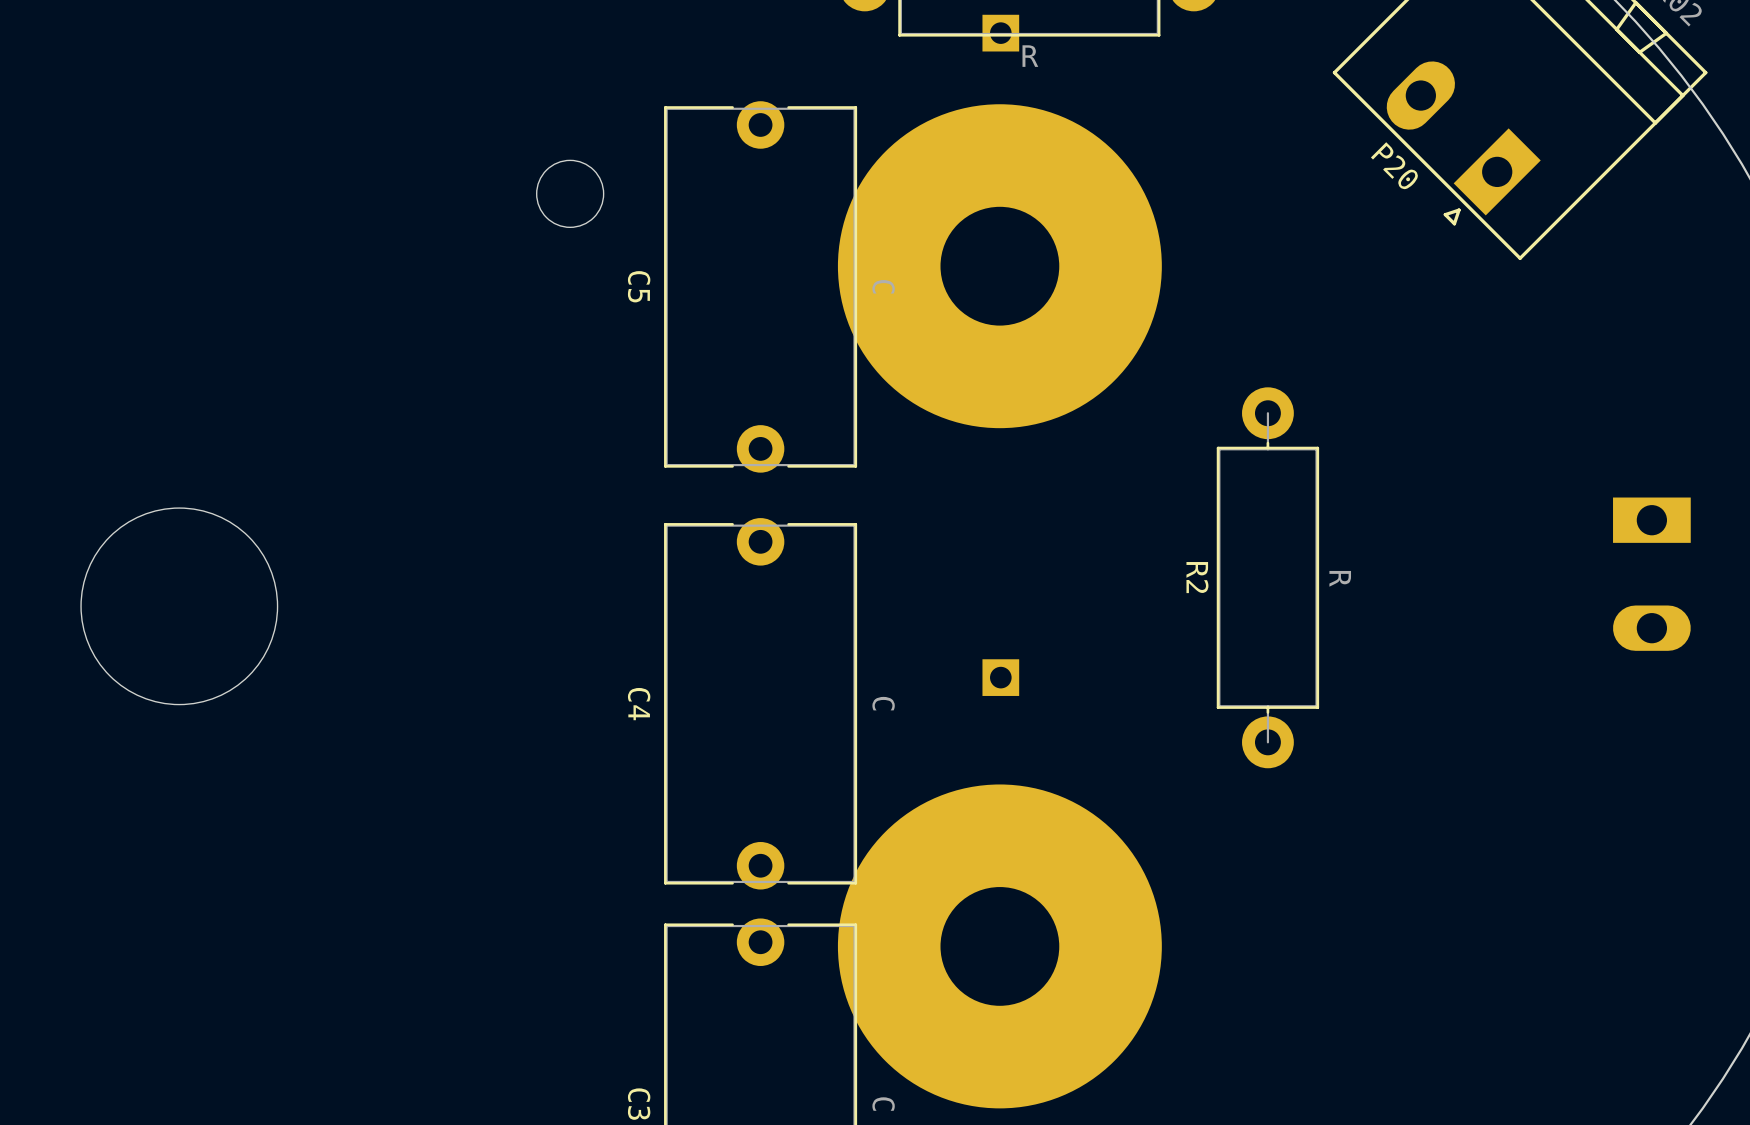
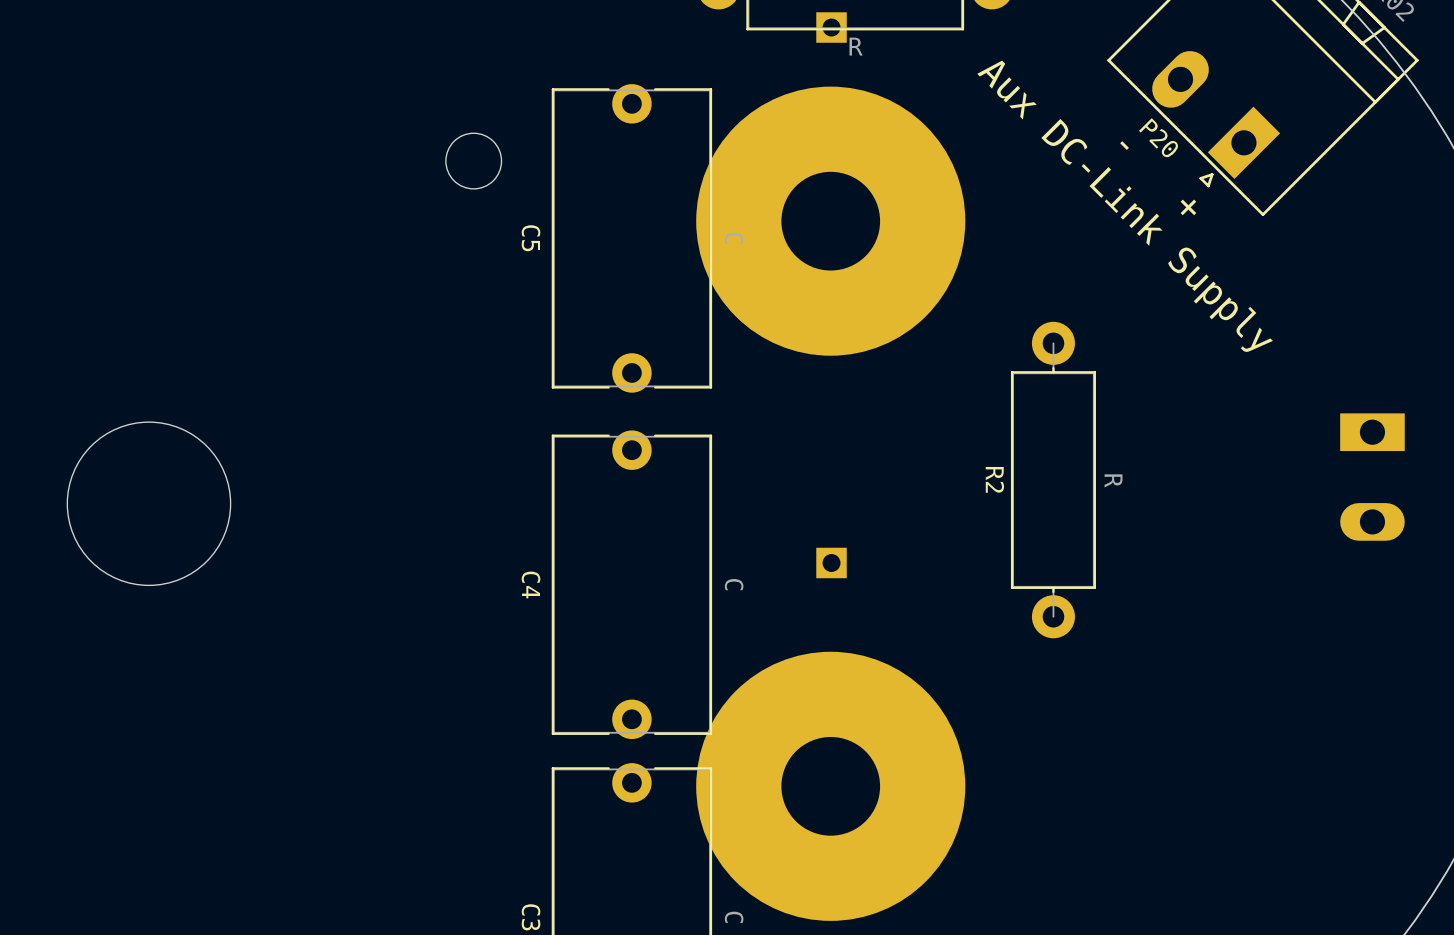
text: none -> - + (1158, 178)
text: none -> Aux DC-Link Supply (1125, 206)

